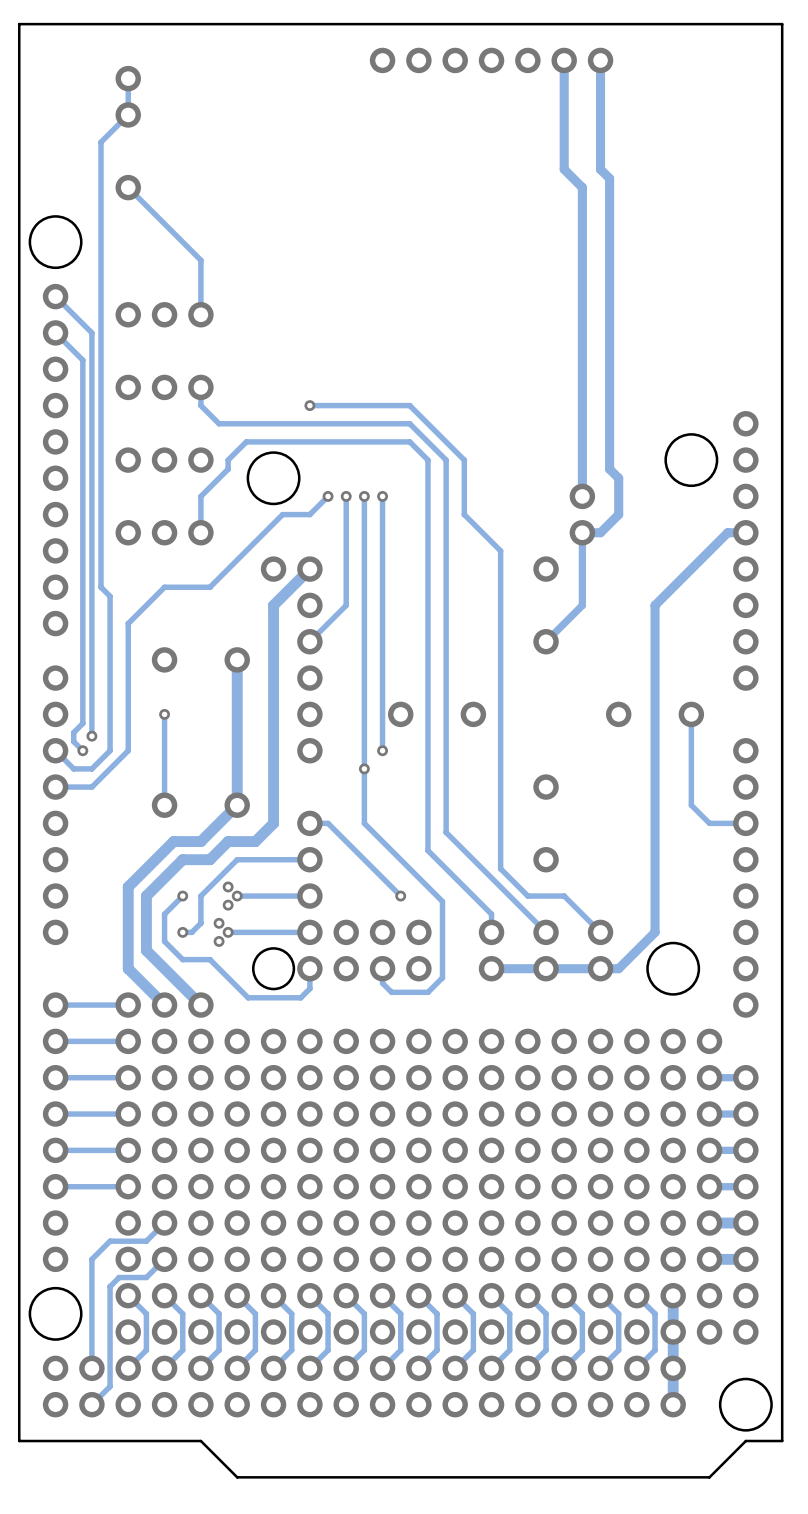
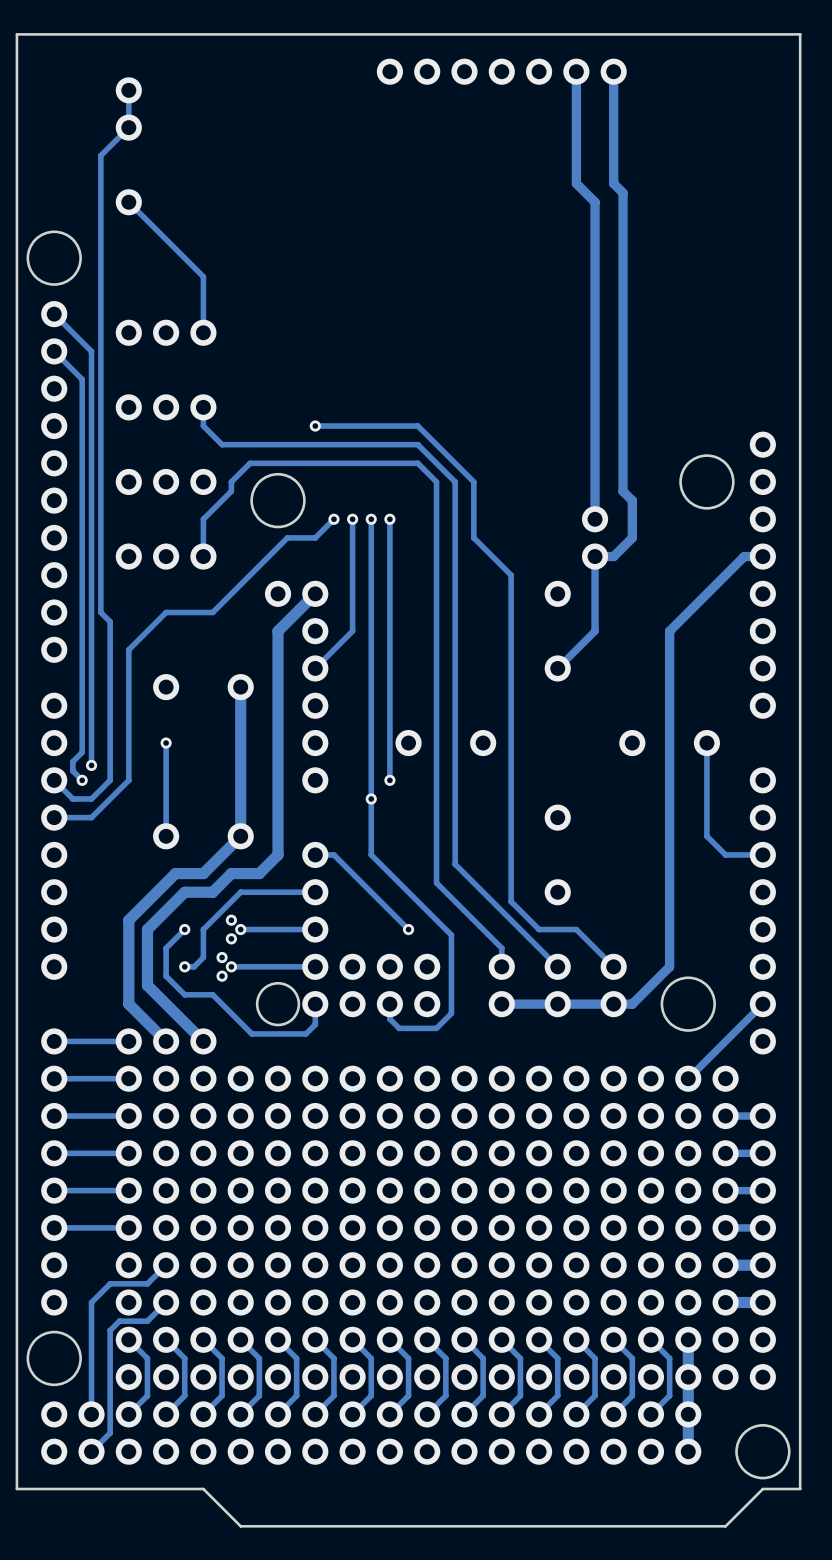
track: none -> (762, 1004) (688, 1078)

